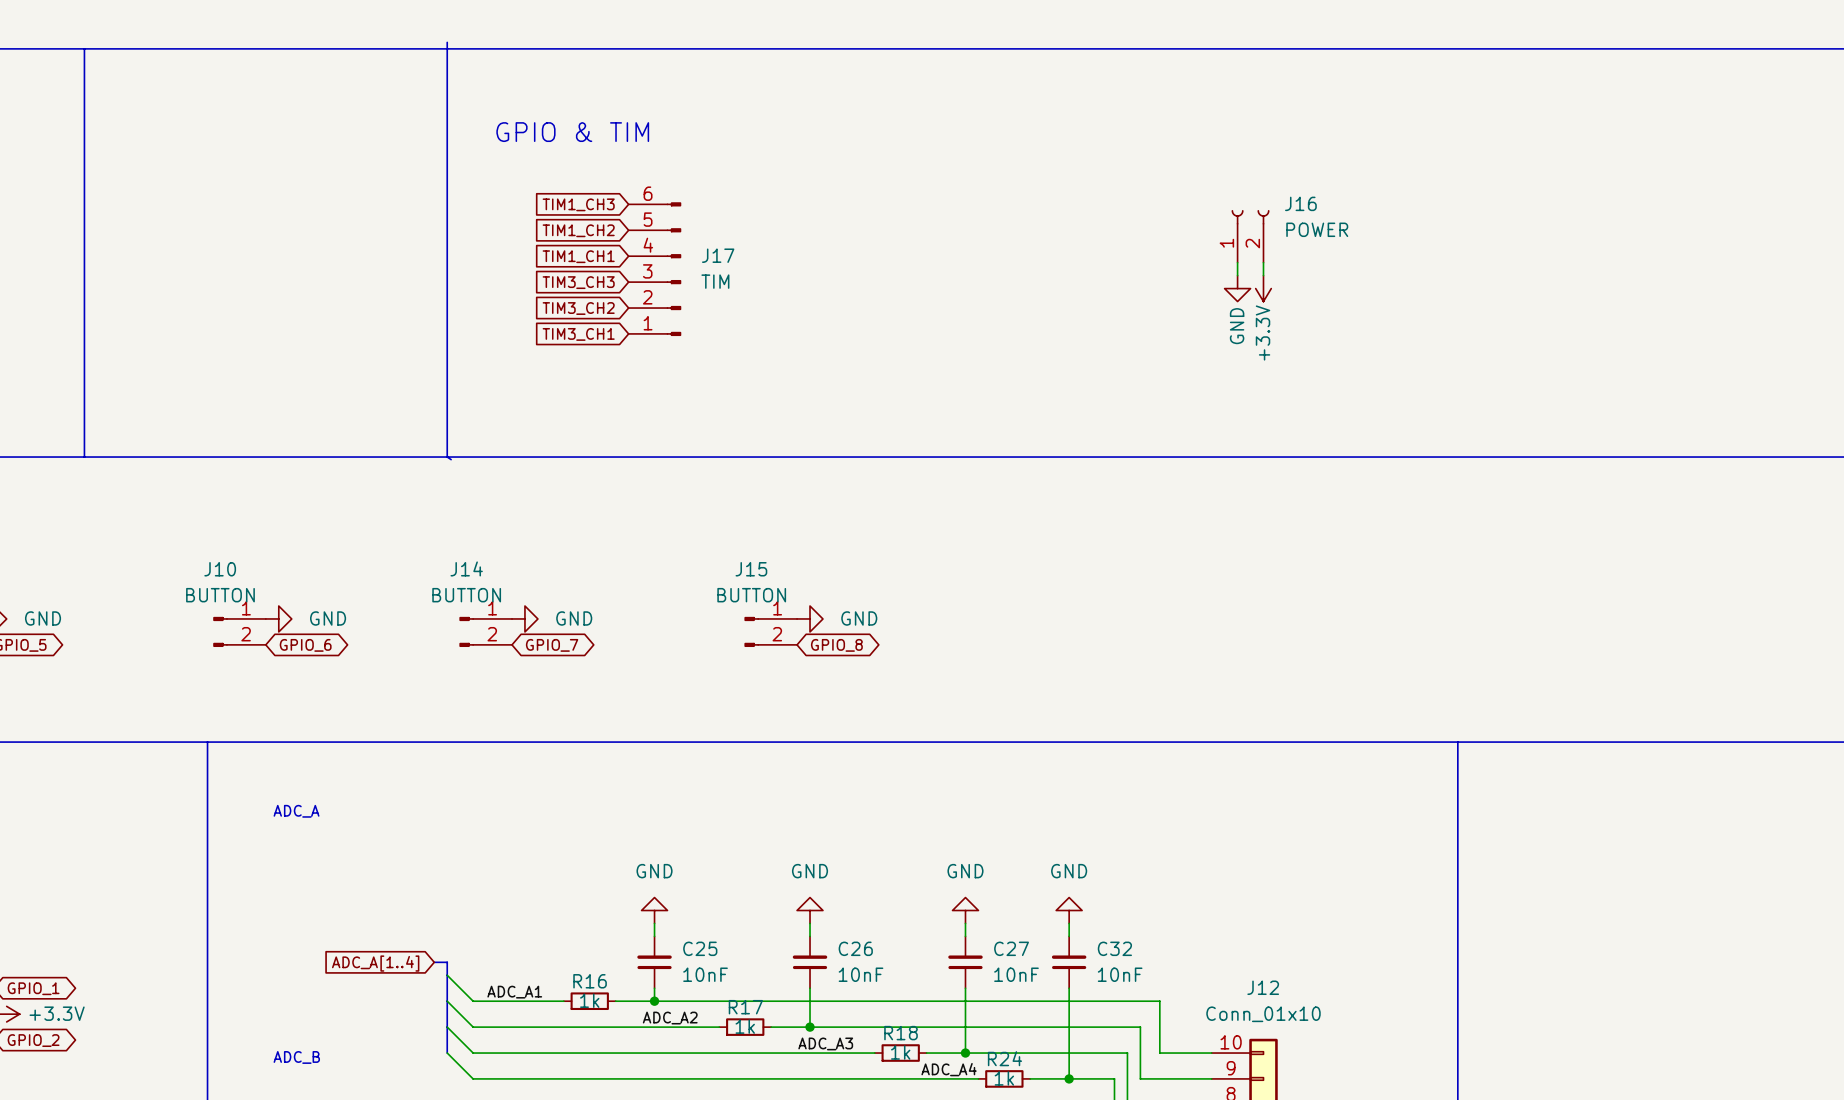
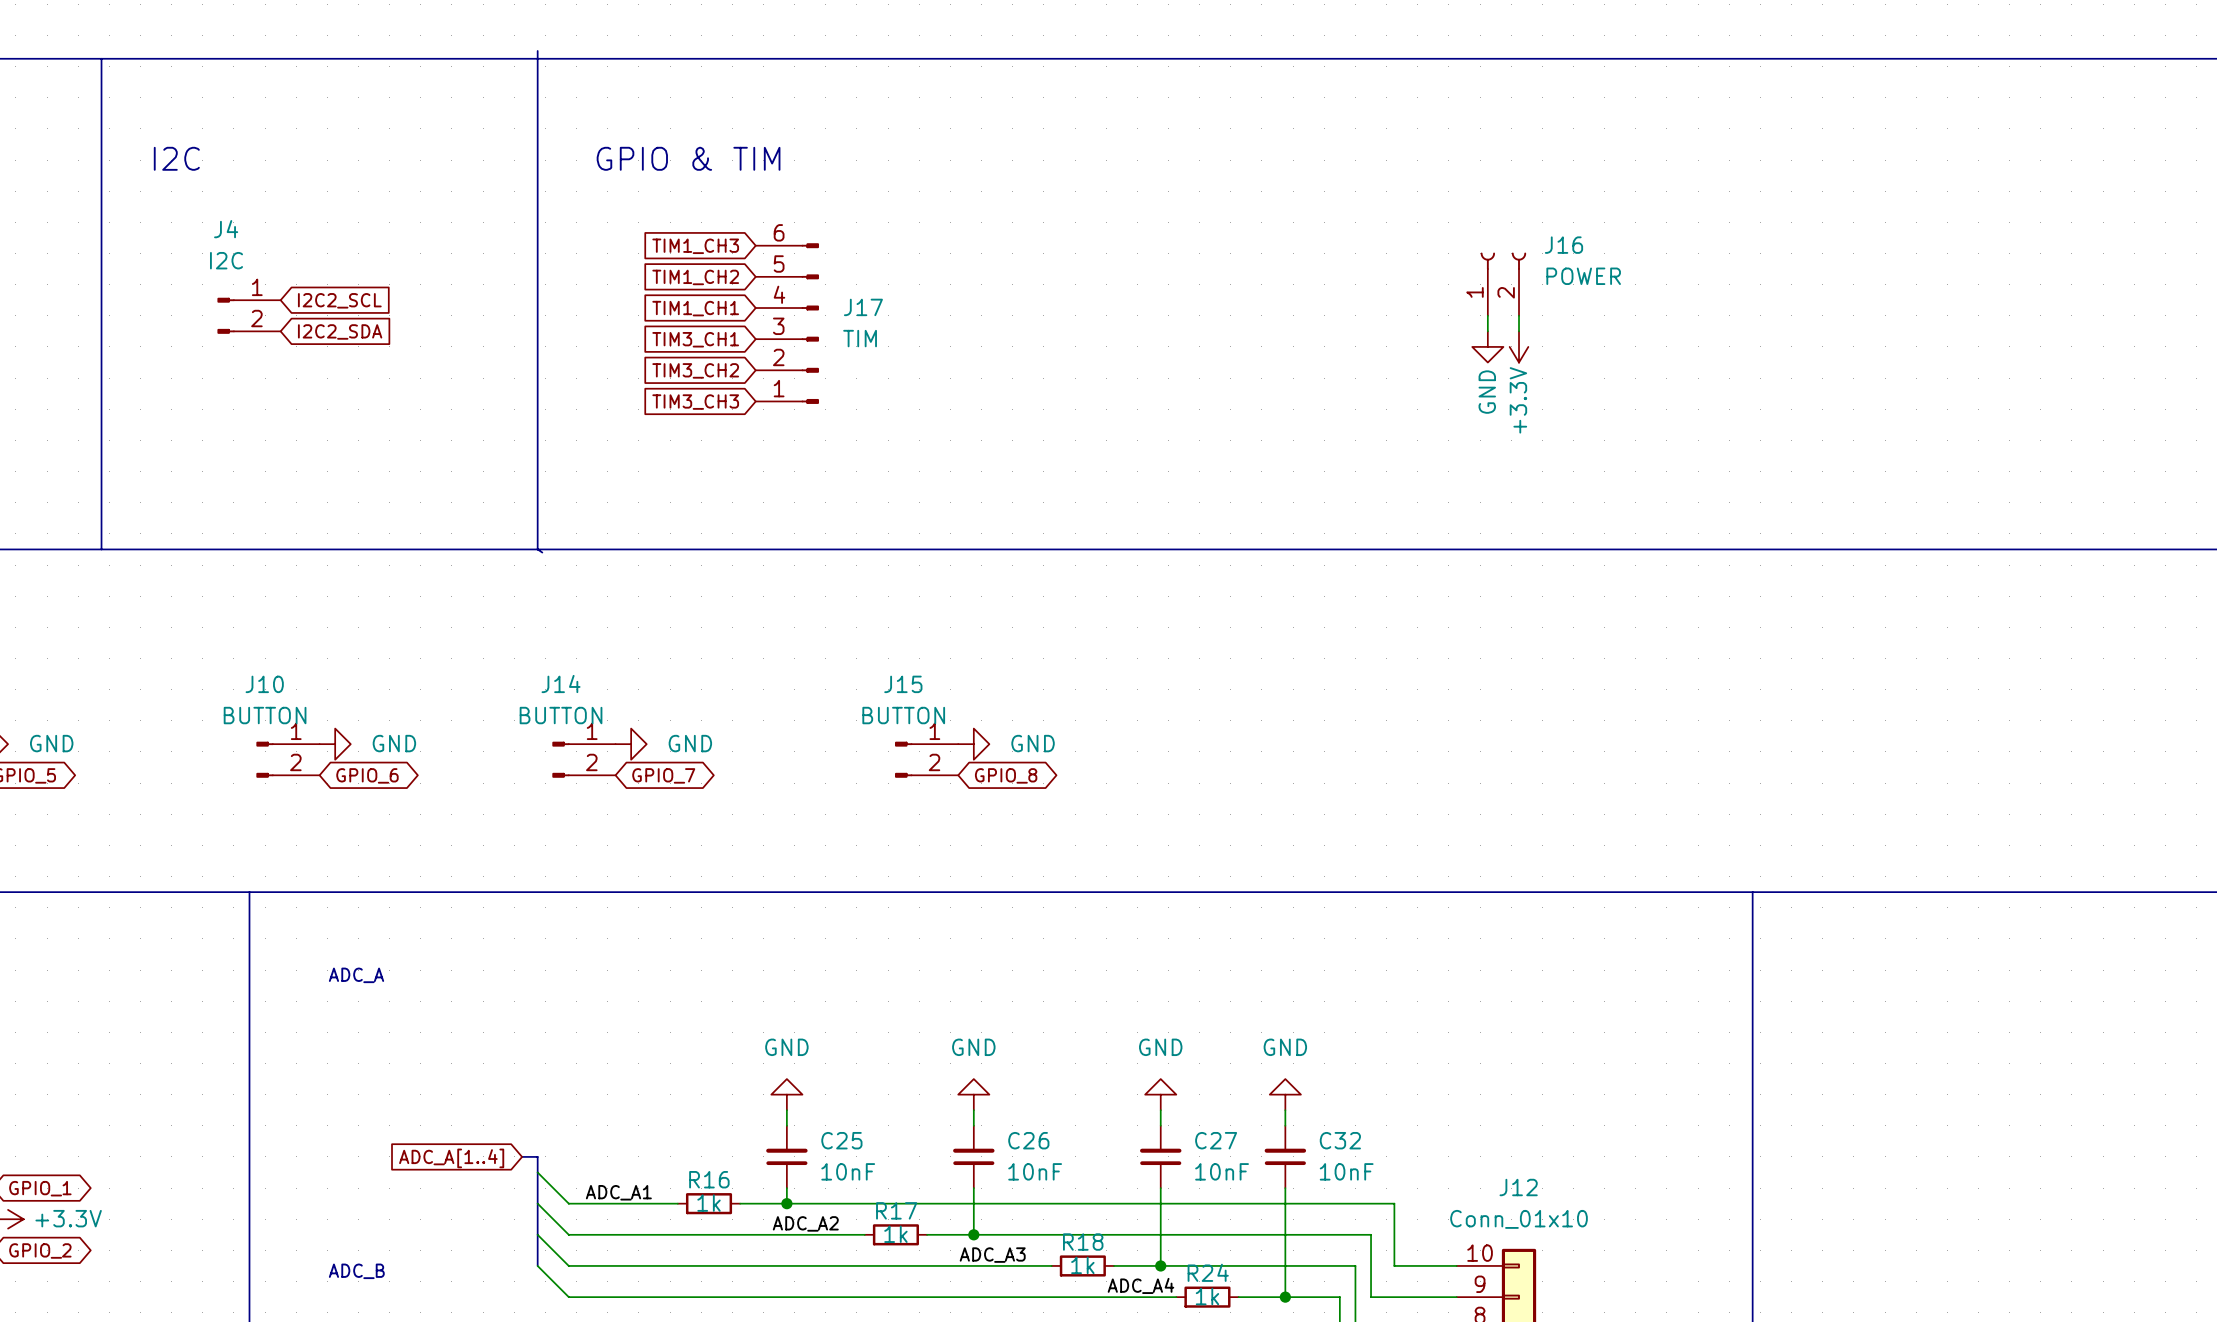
text: none -> I2C (176, 158)
global label: none -> I2C2_SCL (339, 300)
J4: none -> I2C (249, 315)
global label: none -> I2C2_SDA (340, 331)
global label: TIM3_CH3 (578, 282) -> TIM3_CH1 (695, 339)
global label: TIM3_CH1 (578, 334) -> TIM3_CH3 (695, 402)

